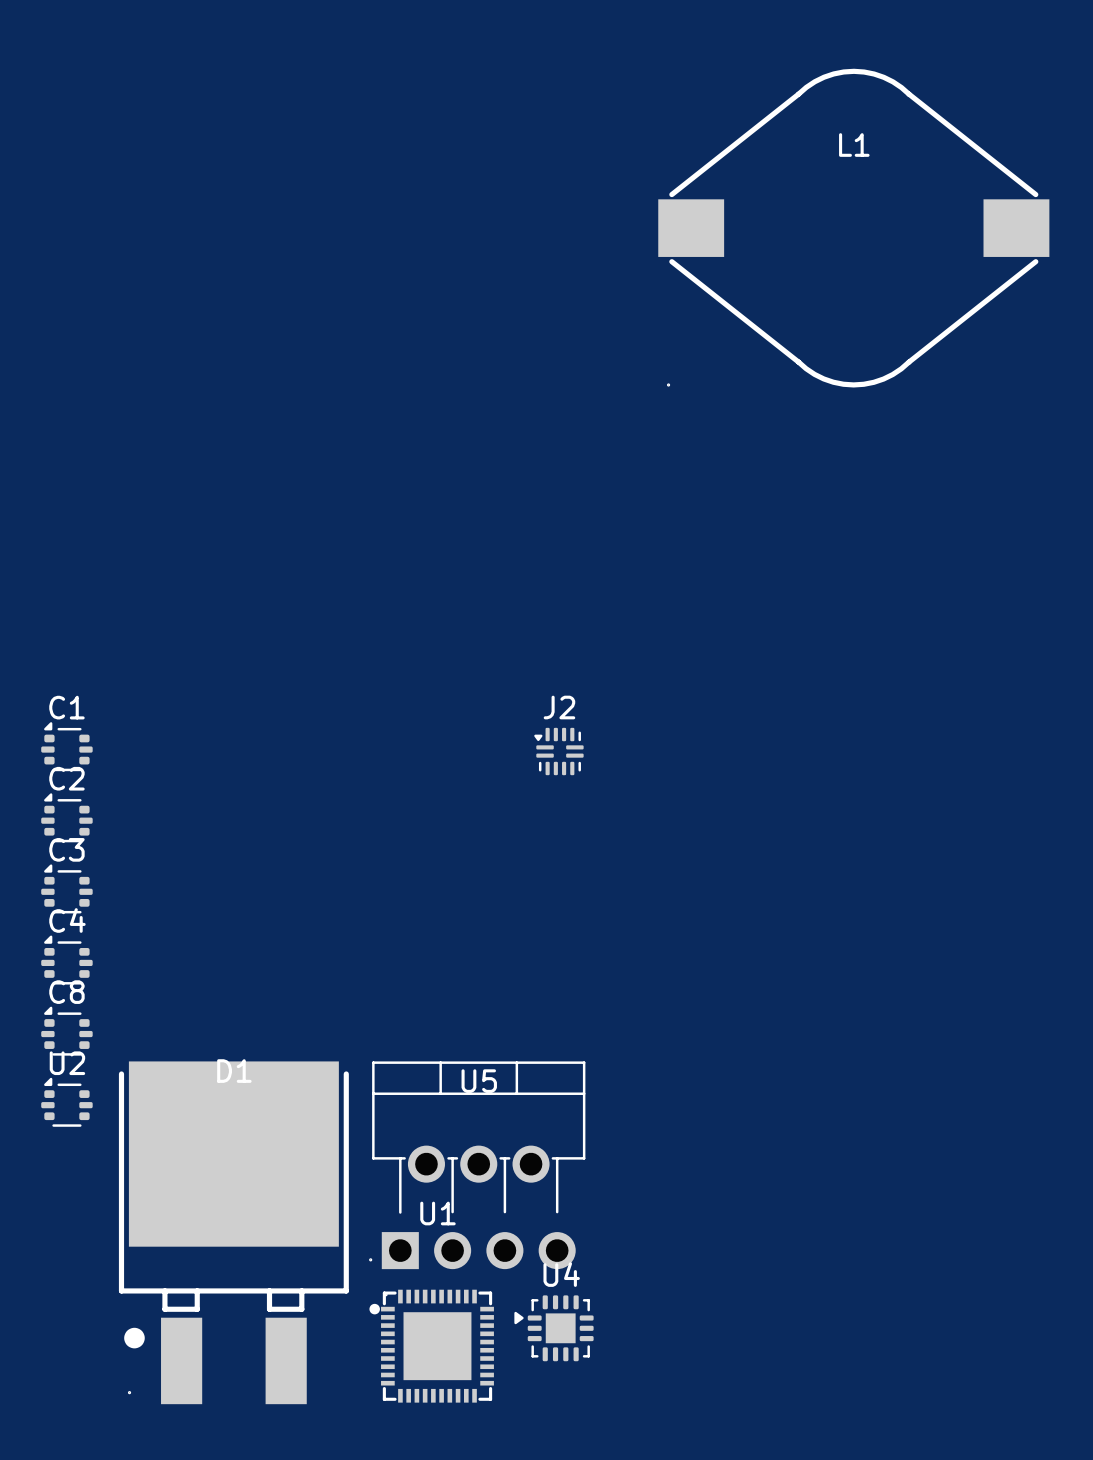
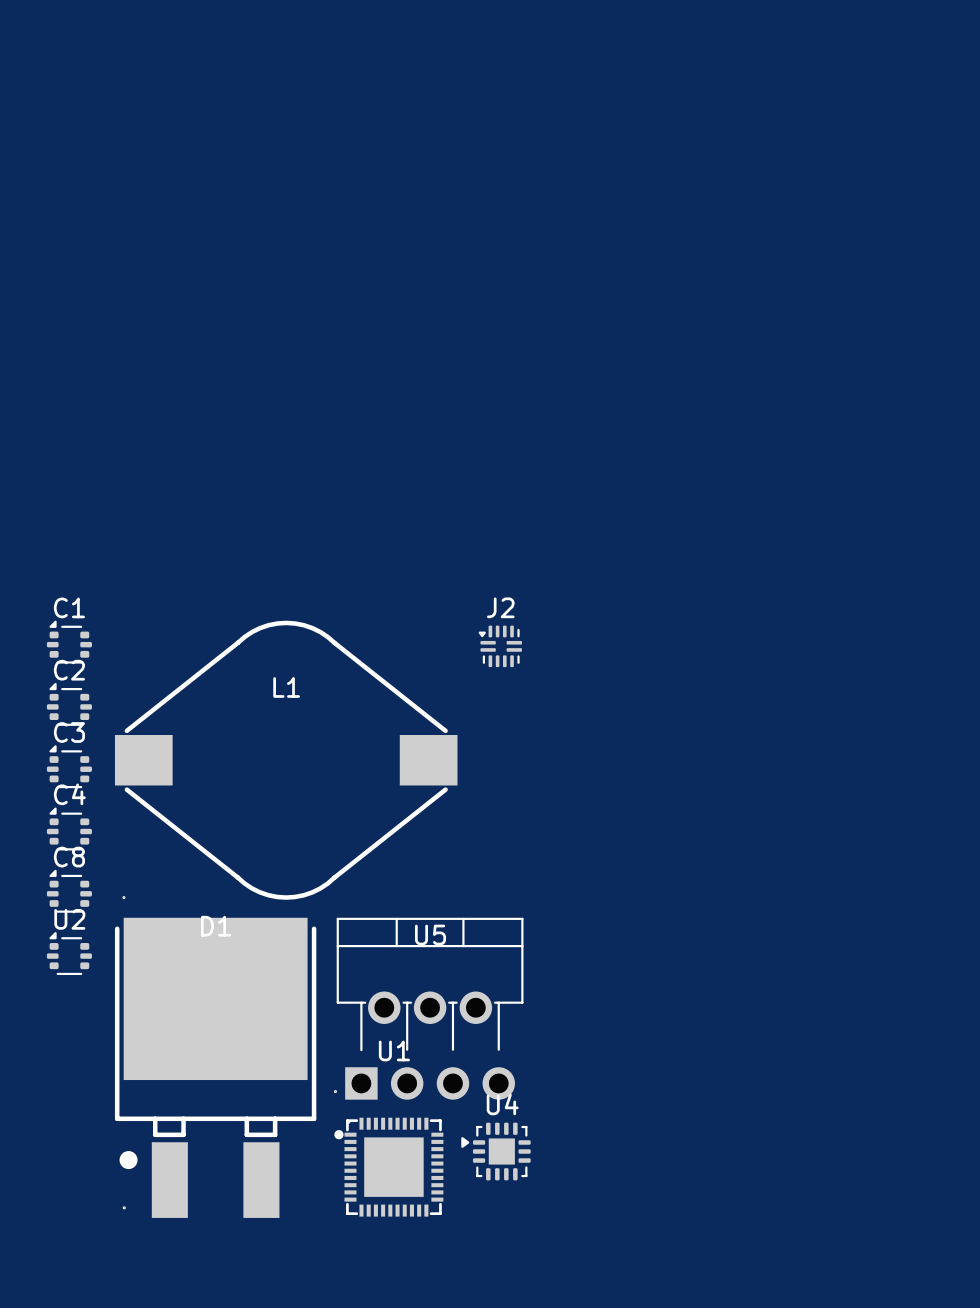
L1 position: (853, 228) -> (286, 760)

